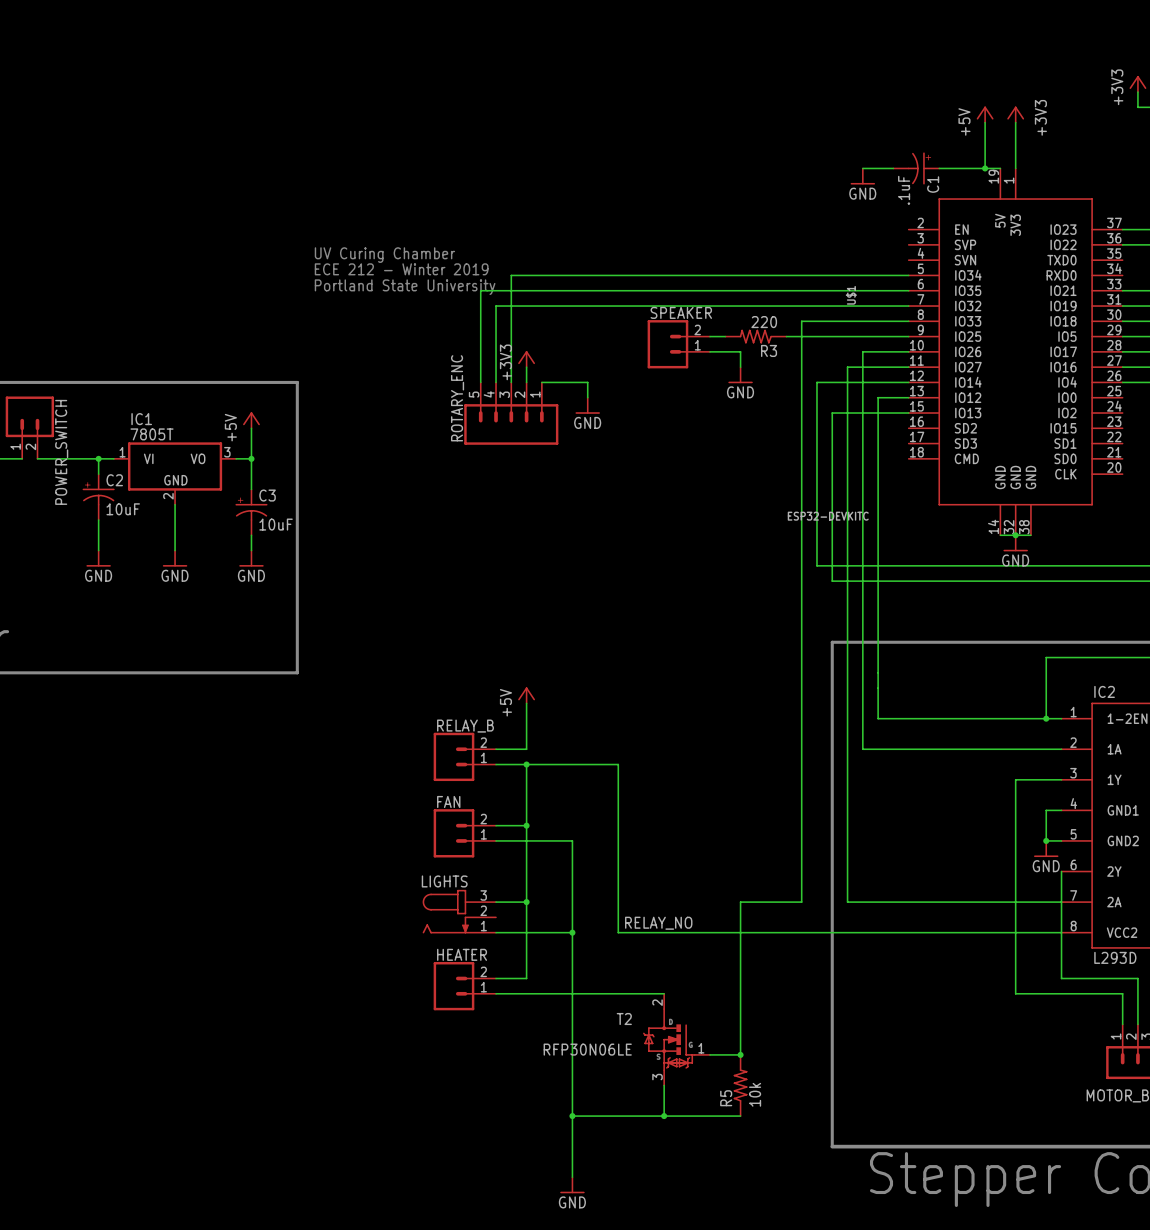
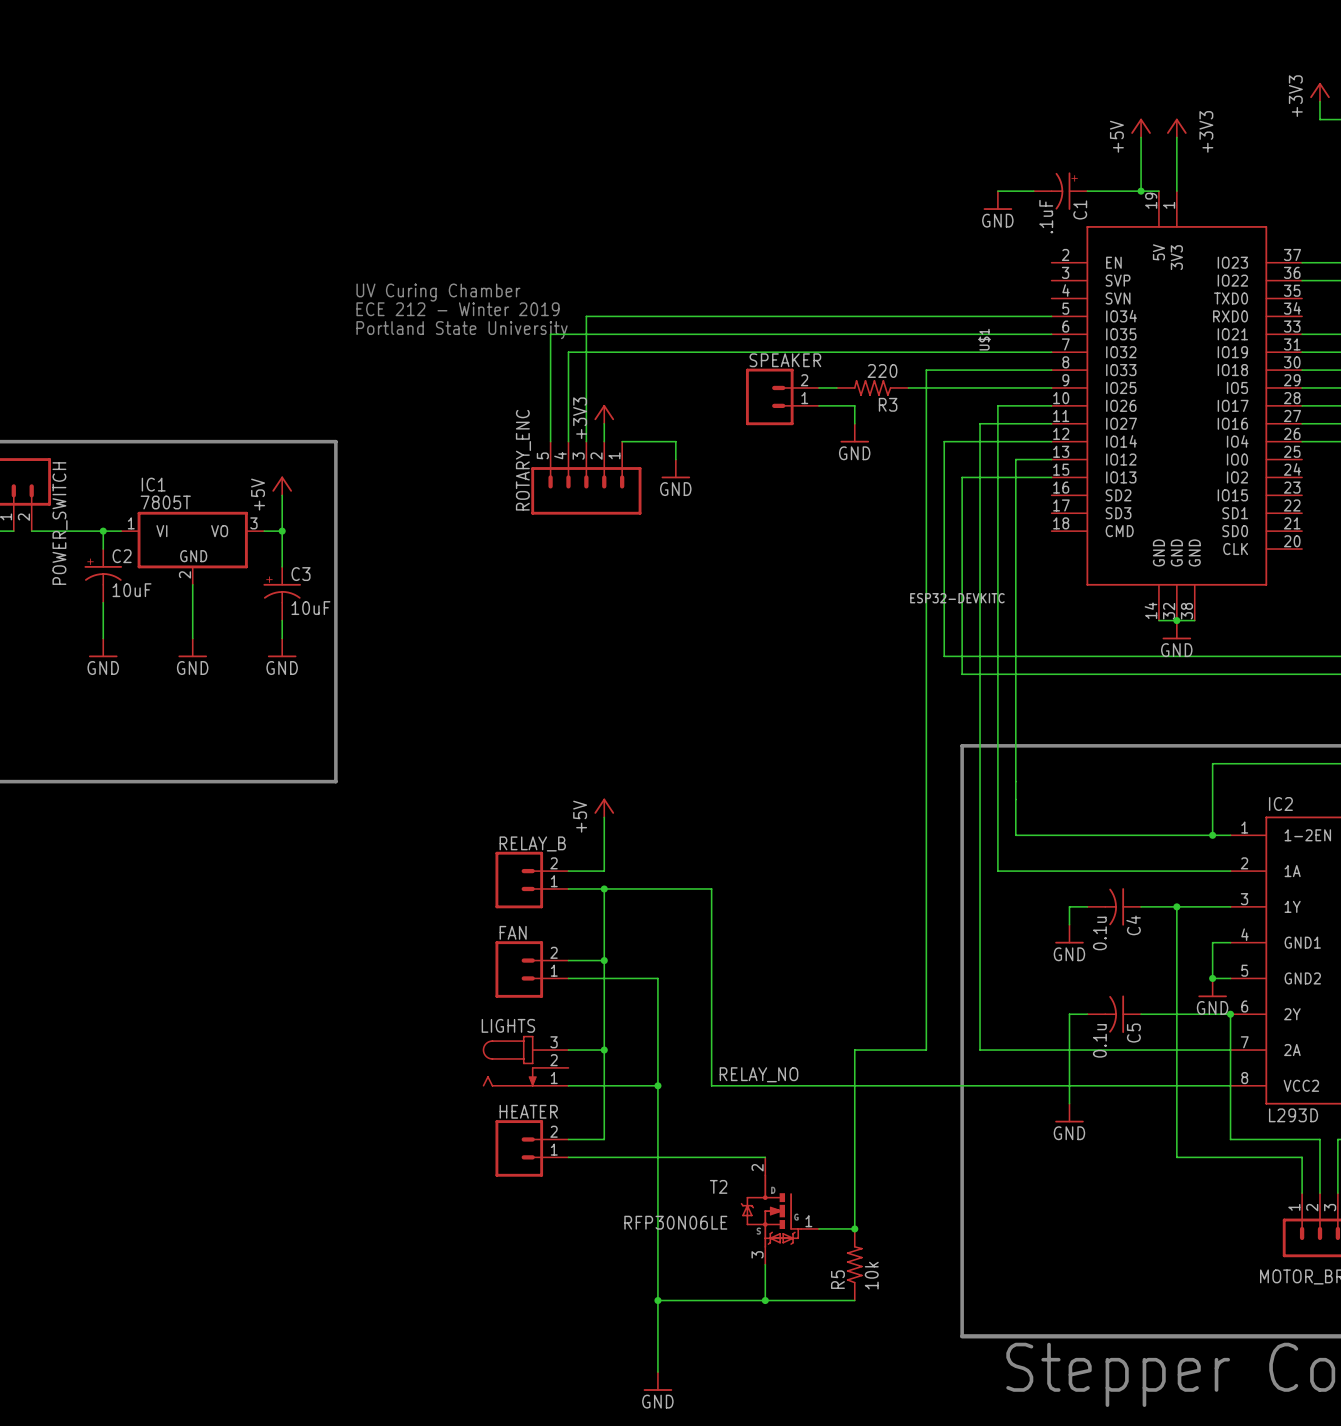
wire: none -> (1087, 906) (1069, 906) (1069, 924)
C4: none -> 0.1u (1114, 906)
wire: none -> (1141, 906) (1176, 906)
junction: none -> (1176, 906)
power symbol: none -> GND (1069, 934)
wire: none -> (1087, 1014) (1069, 1014) (1069, 1103)
C5: none -> 0.1u (1114, 1014)
wire: none -> (1141, 1014) (1230, 1014)
junction: none -> (1230, 1014)
power symbol: none -> GND (1069, 1113)

